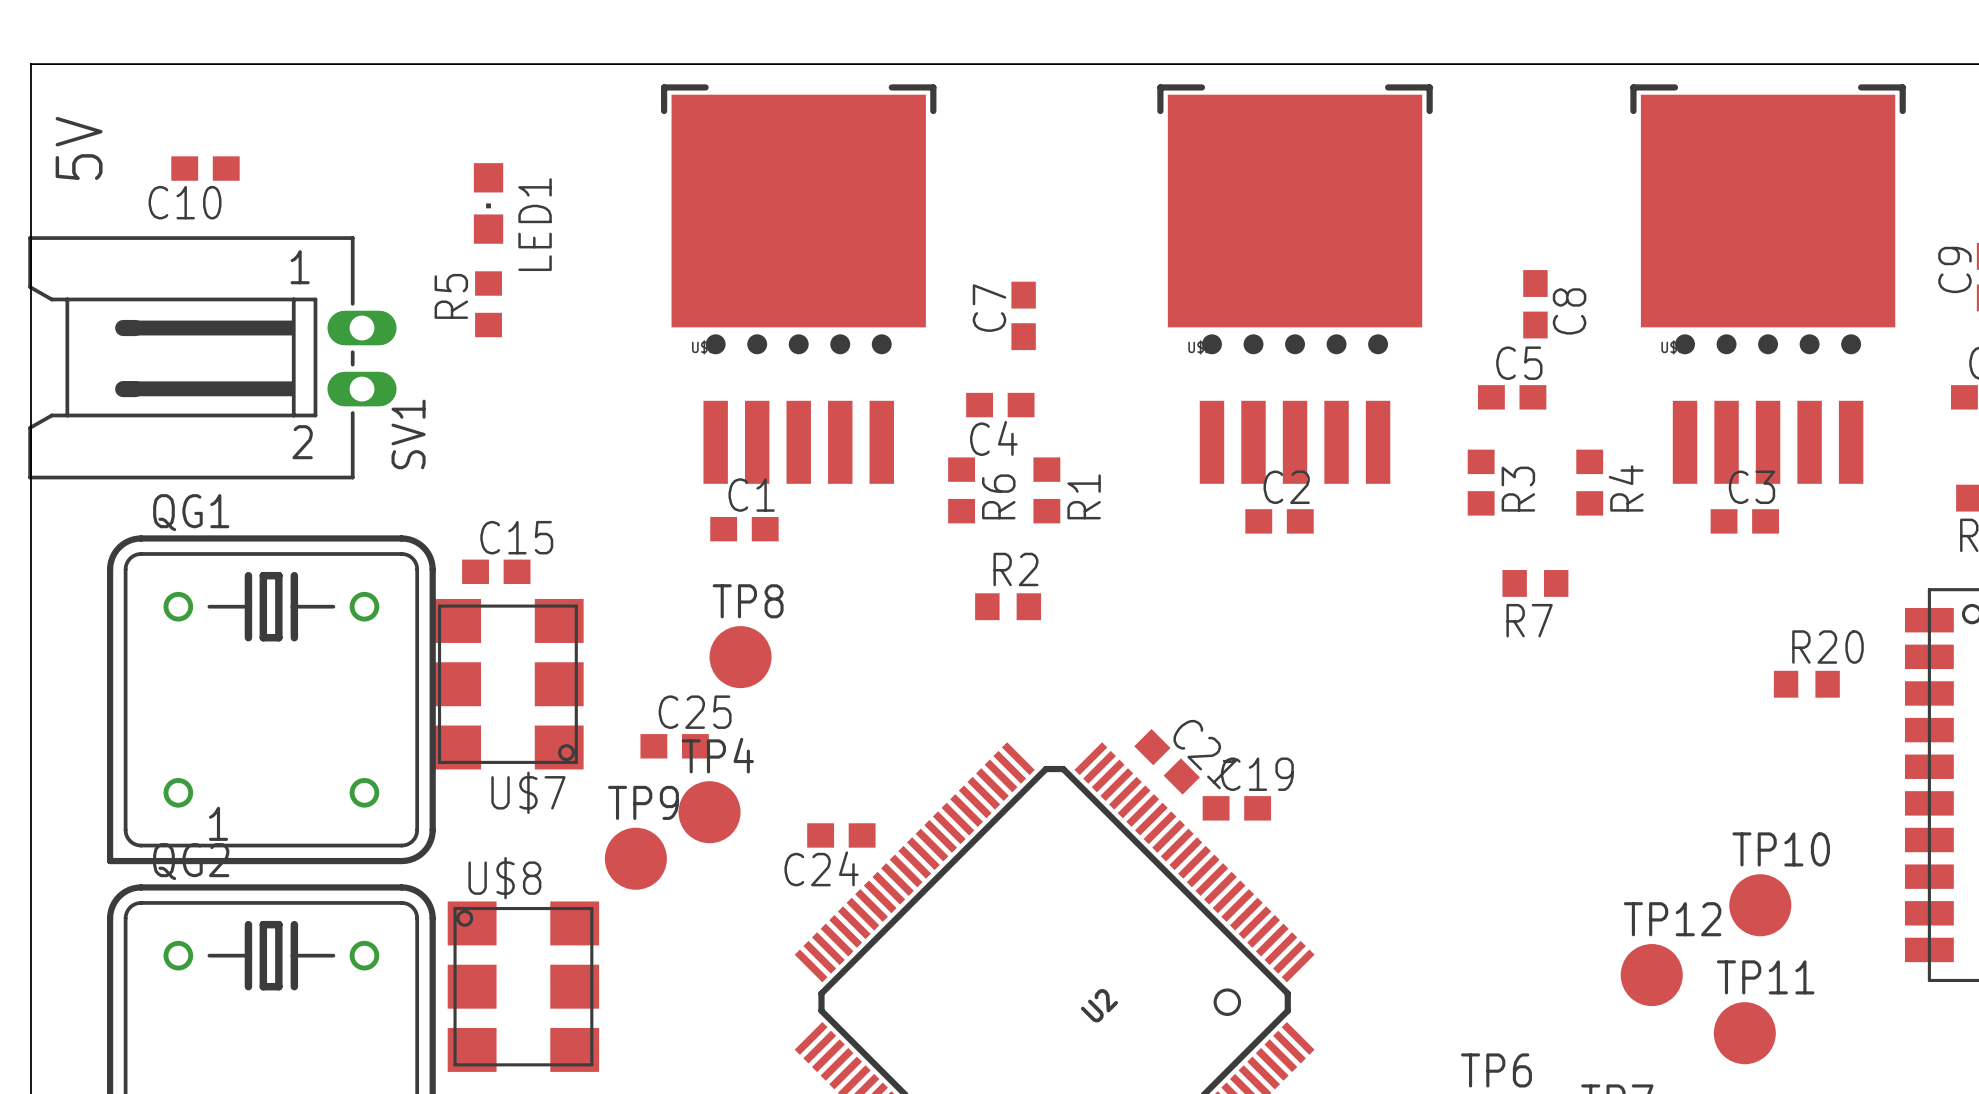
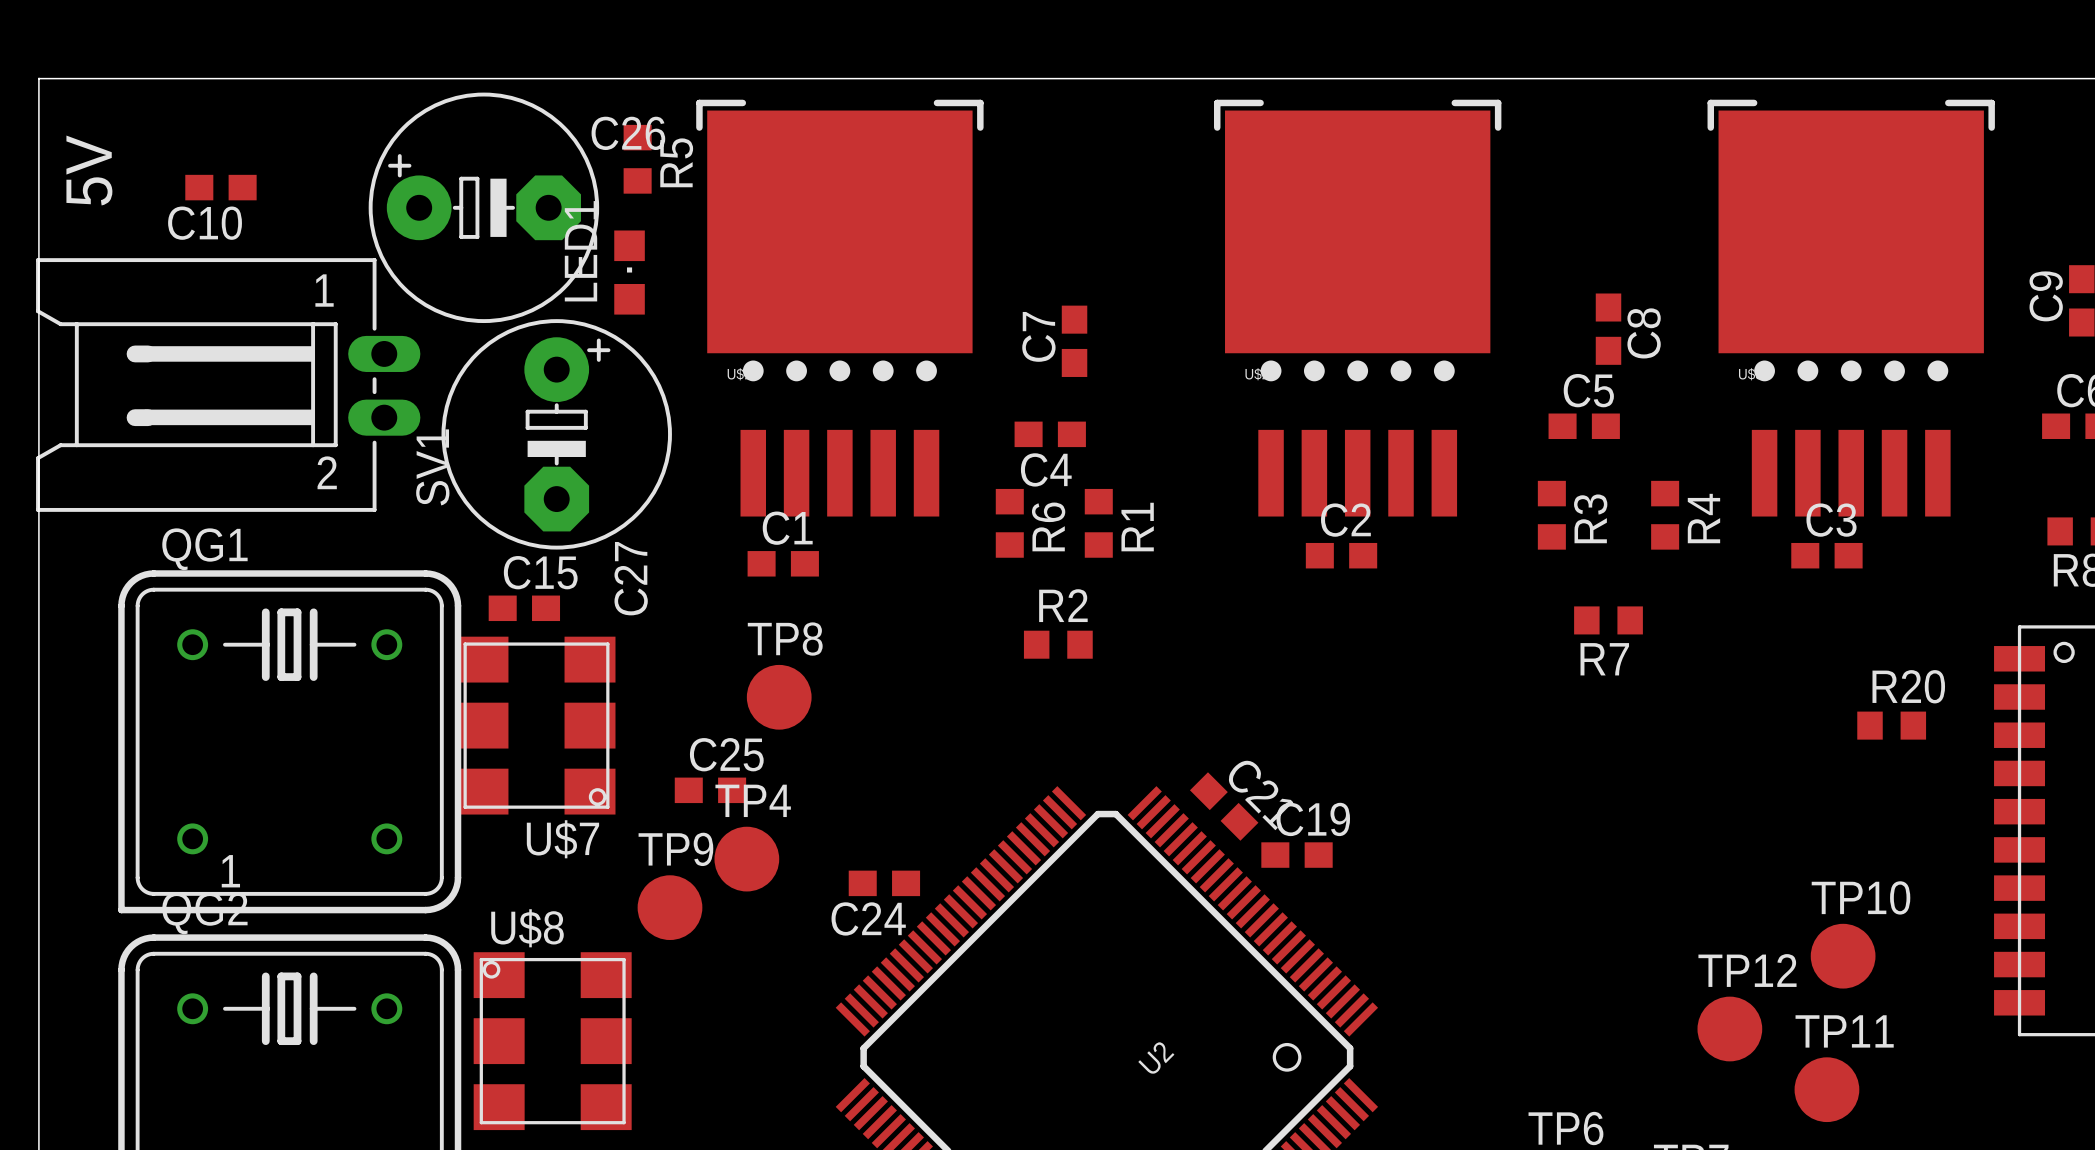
C26: none -> (483, 207)
LED1 rotation: 0° (488, 203) -> 180° (629, 272)
LED1 position: (488, 203) -> (629, 272)
R5 name position: R5 (451, 296) -> R5 (676, 162)
R5 position: (488, 304) -> (637, 159)
C27: none -> (556, 434)

